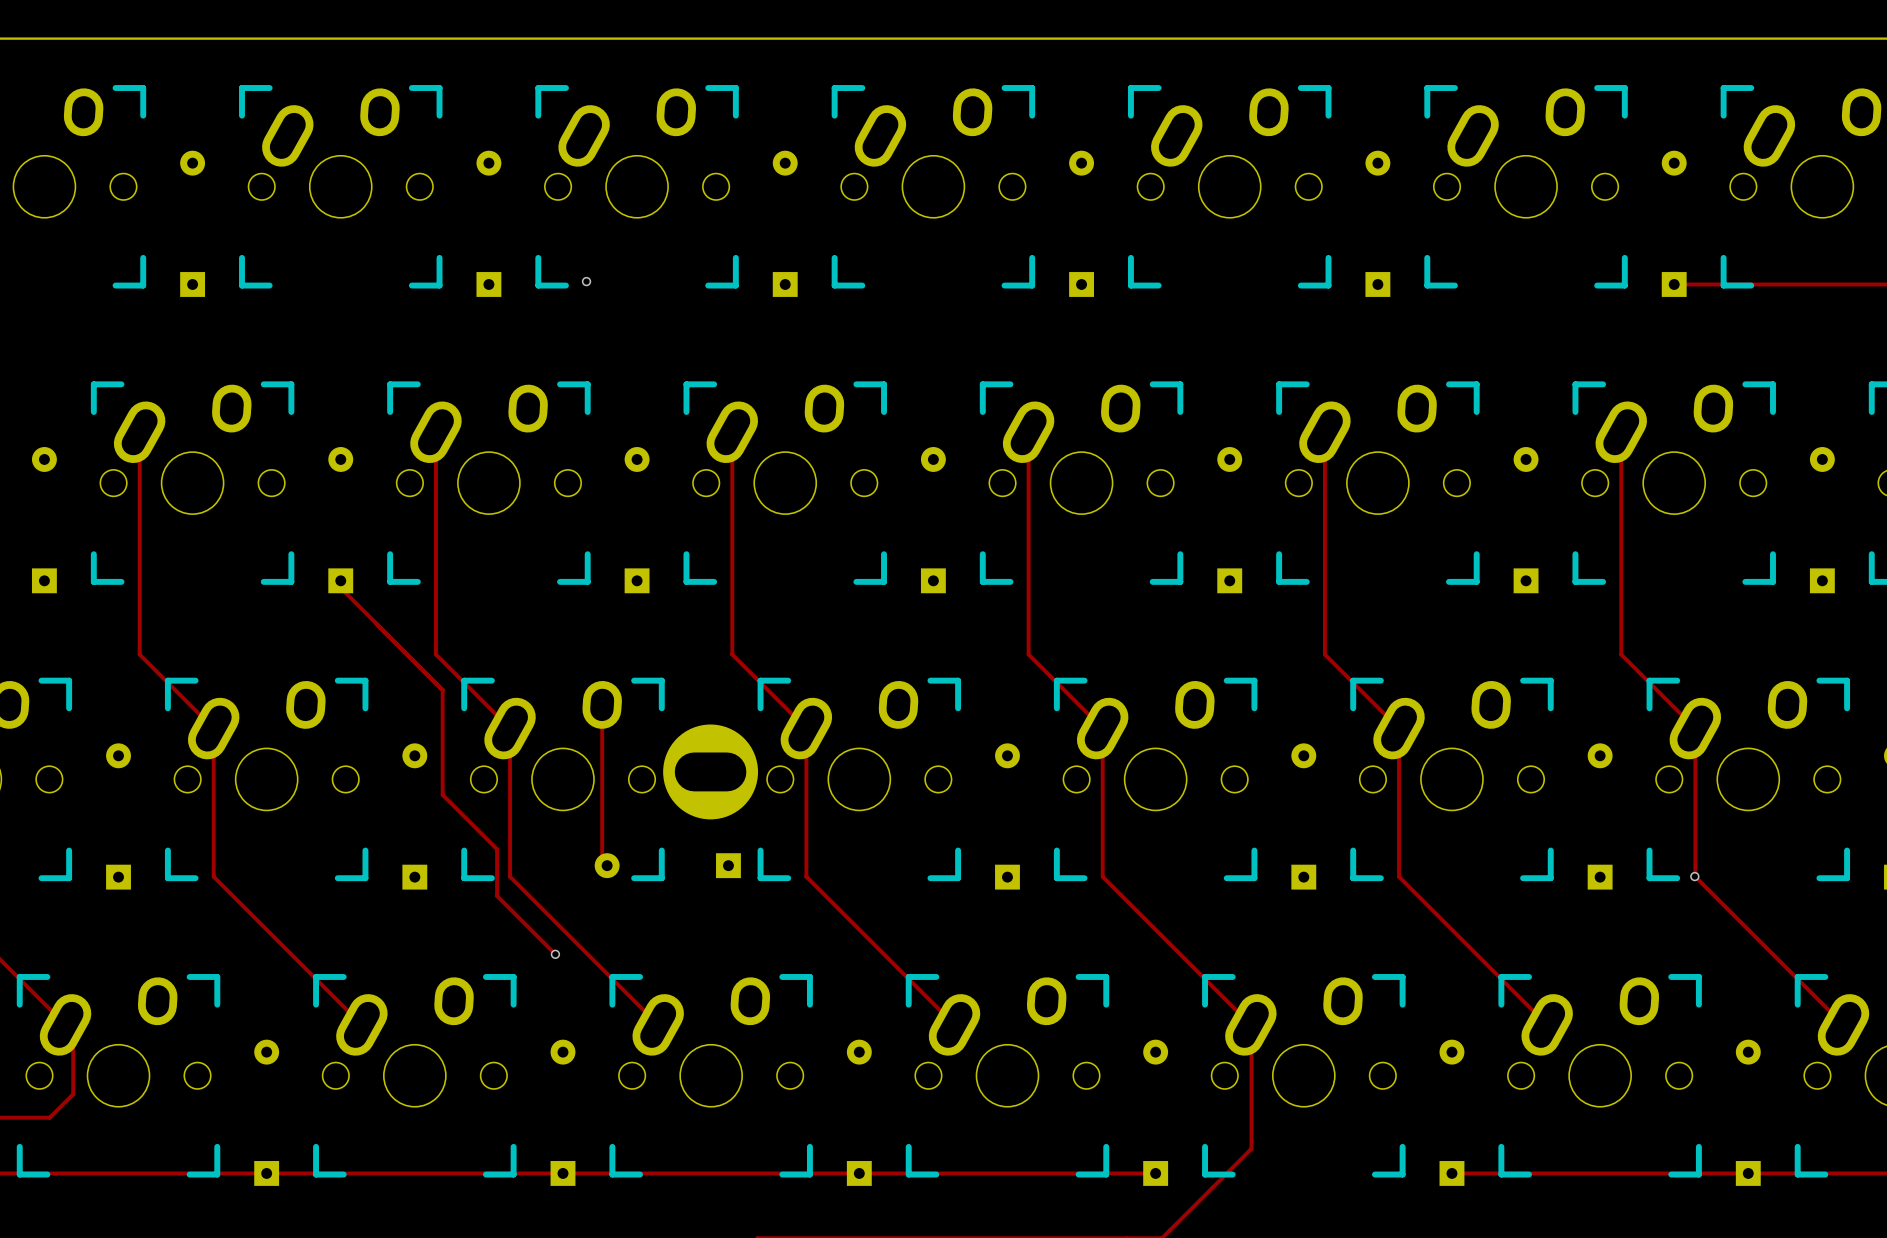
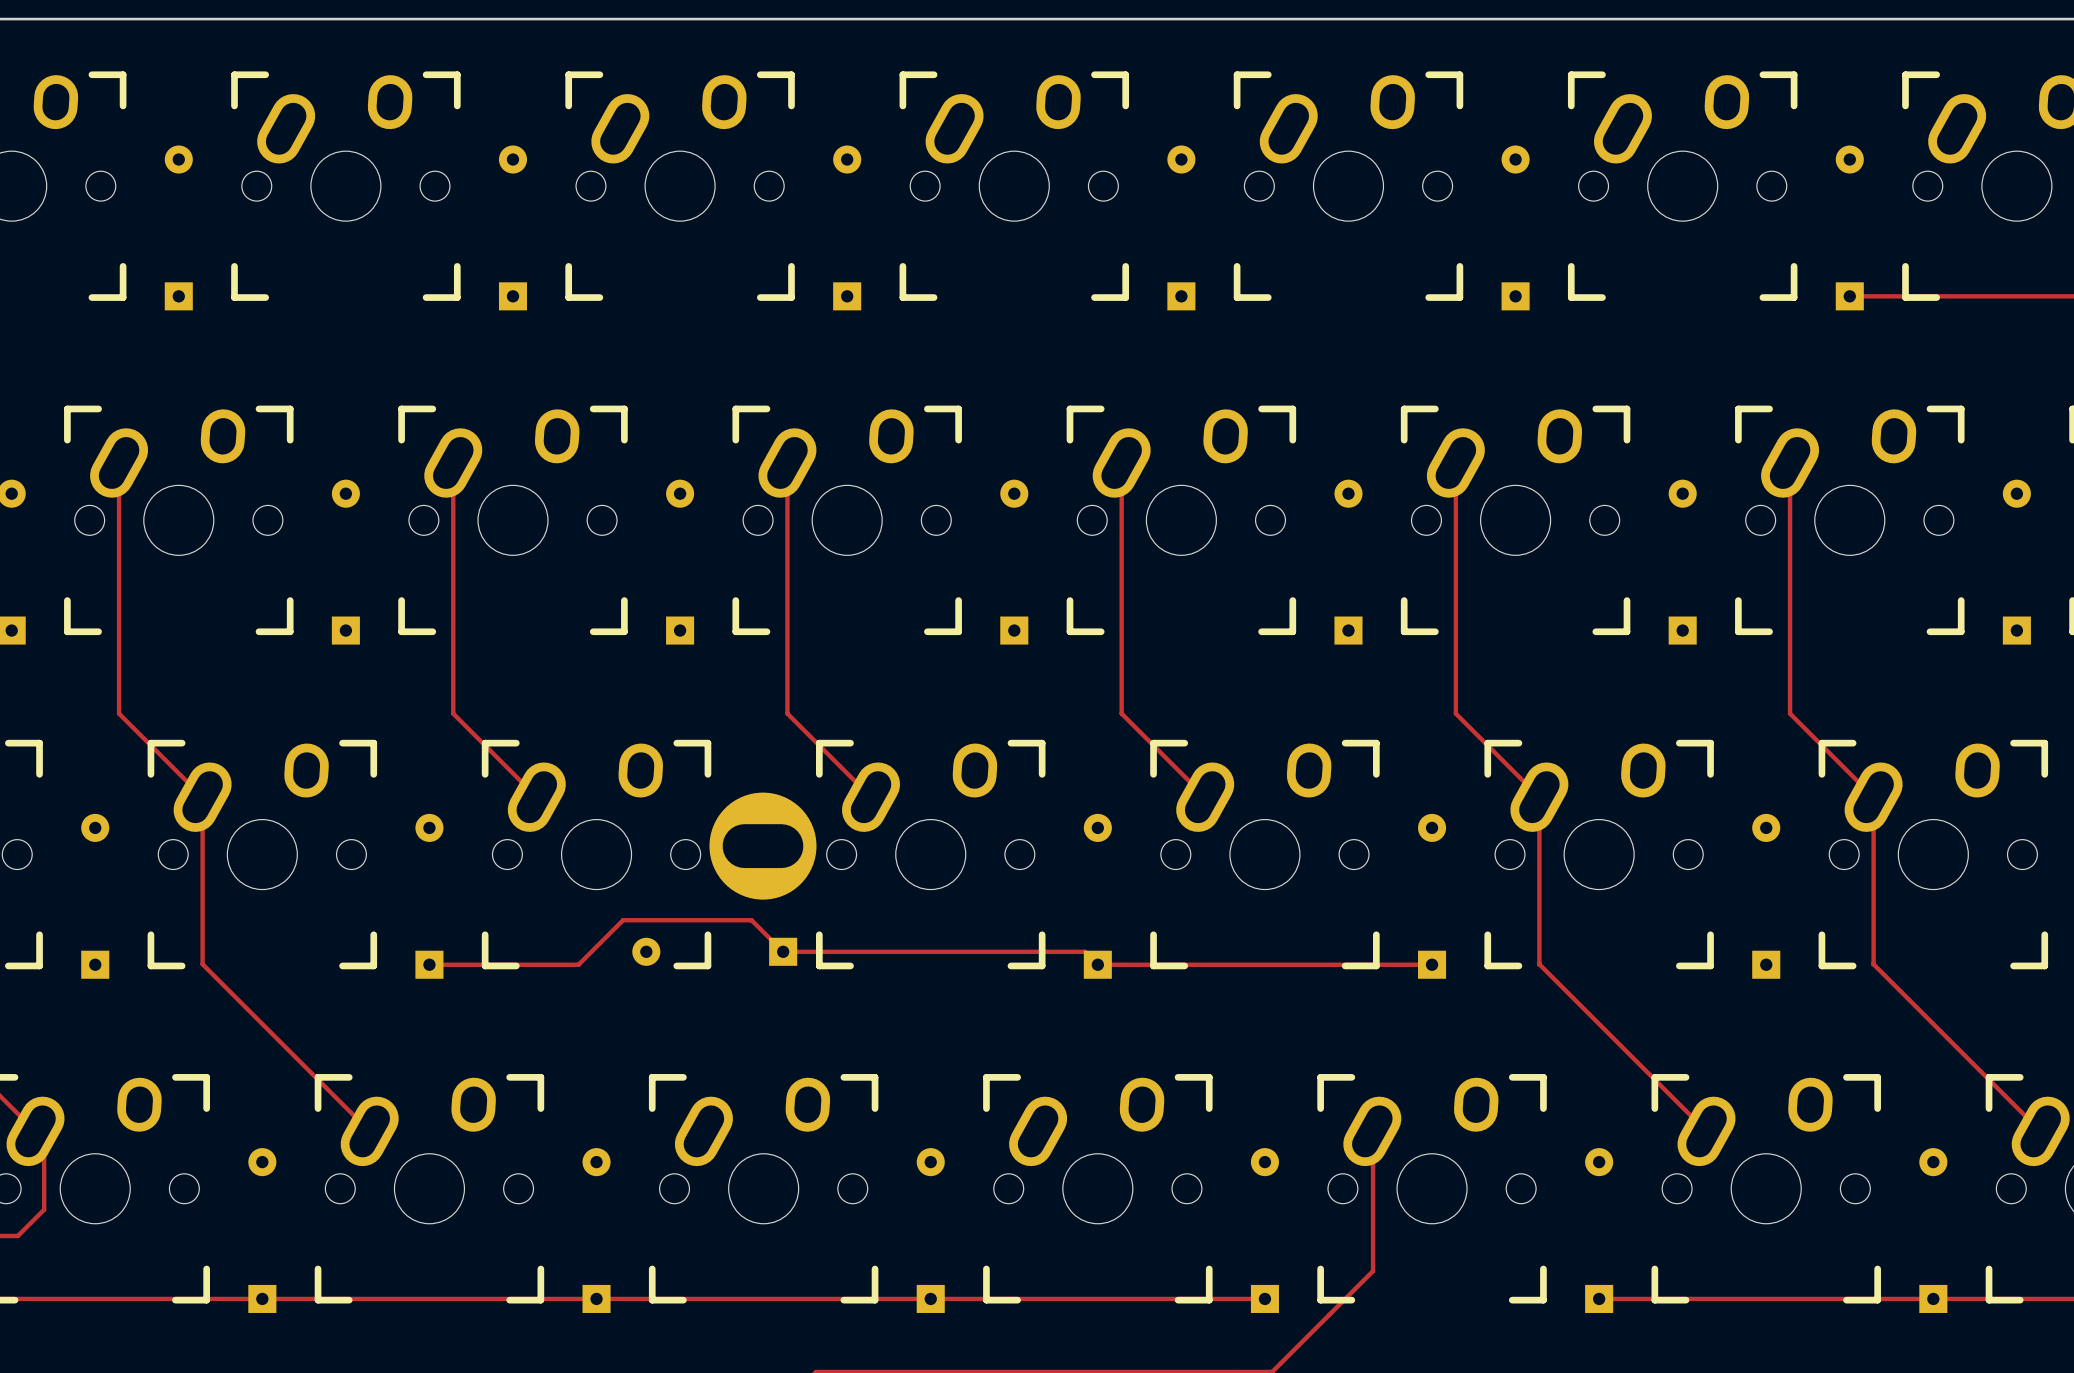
via: (586, 281) -> none
track: (340, 588) (442, 689) (442, 794) (497, 849) (497, 895) (555, 954) -> none
track: (602, 704) (602, 860) (607, 865) -> none
track: (510, 728) (510, 876) (658, 1024) -> none
track: (806, 728) (806, 876) (954, 1024) -> none
track: (1102, 728) (1102, 876) (1250, 1024) -> none
via: (1694, 876) -> none
track: none -> (429, 964) (578, 964) (623, 920) (751, 920) (783, 951) (1084, 951) (1097, 964) (1432, 964)
via: (555, 954) -> none

